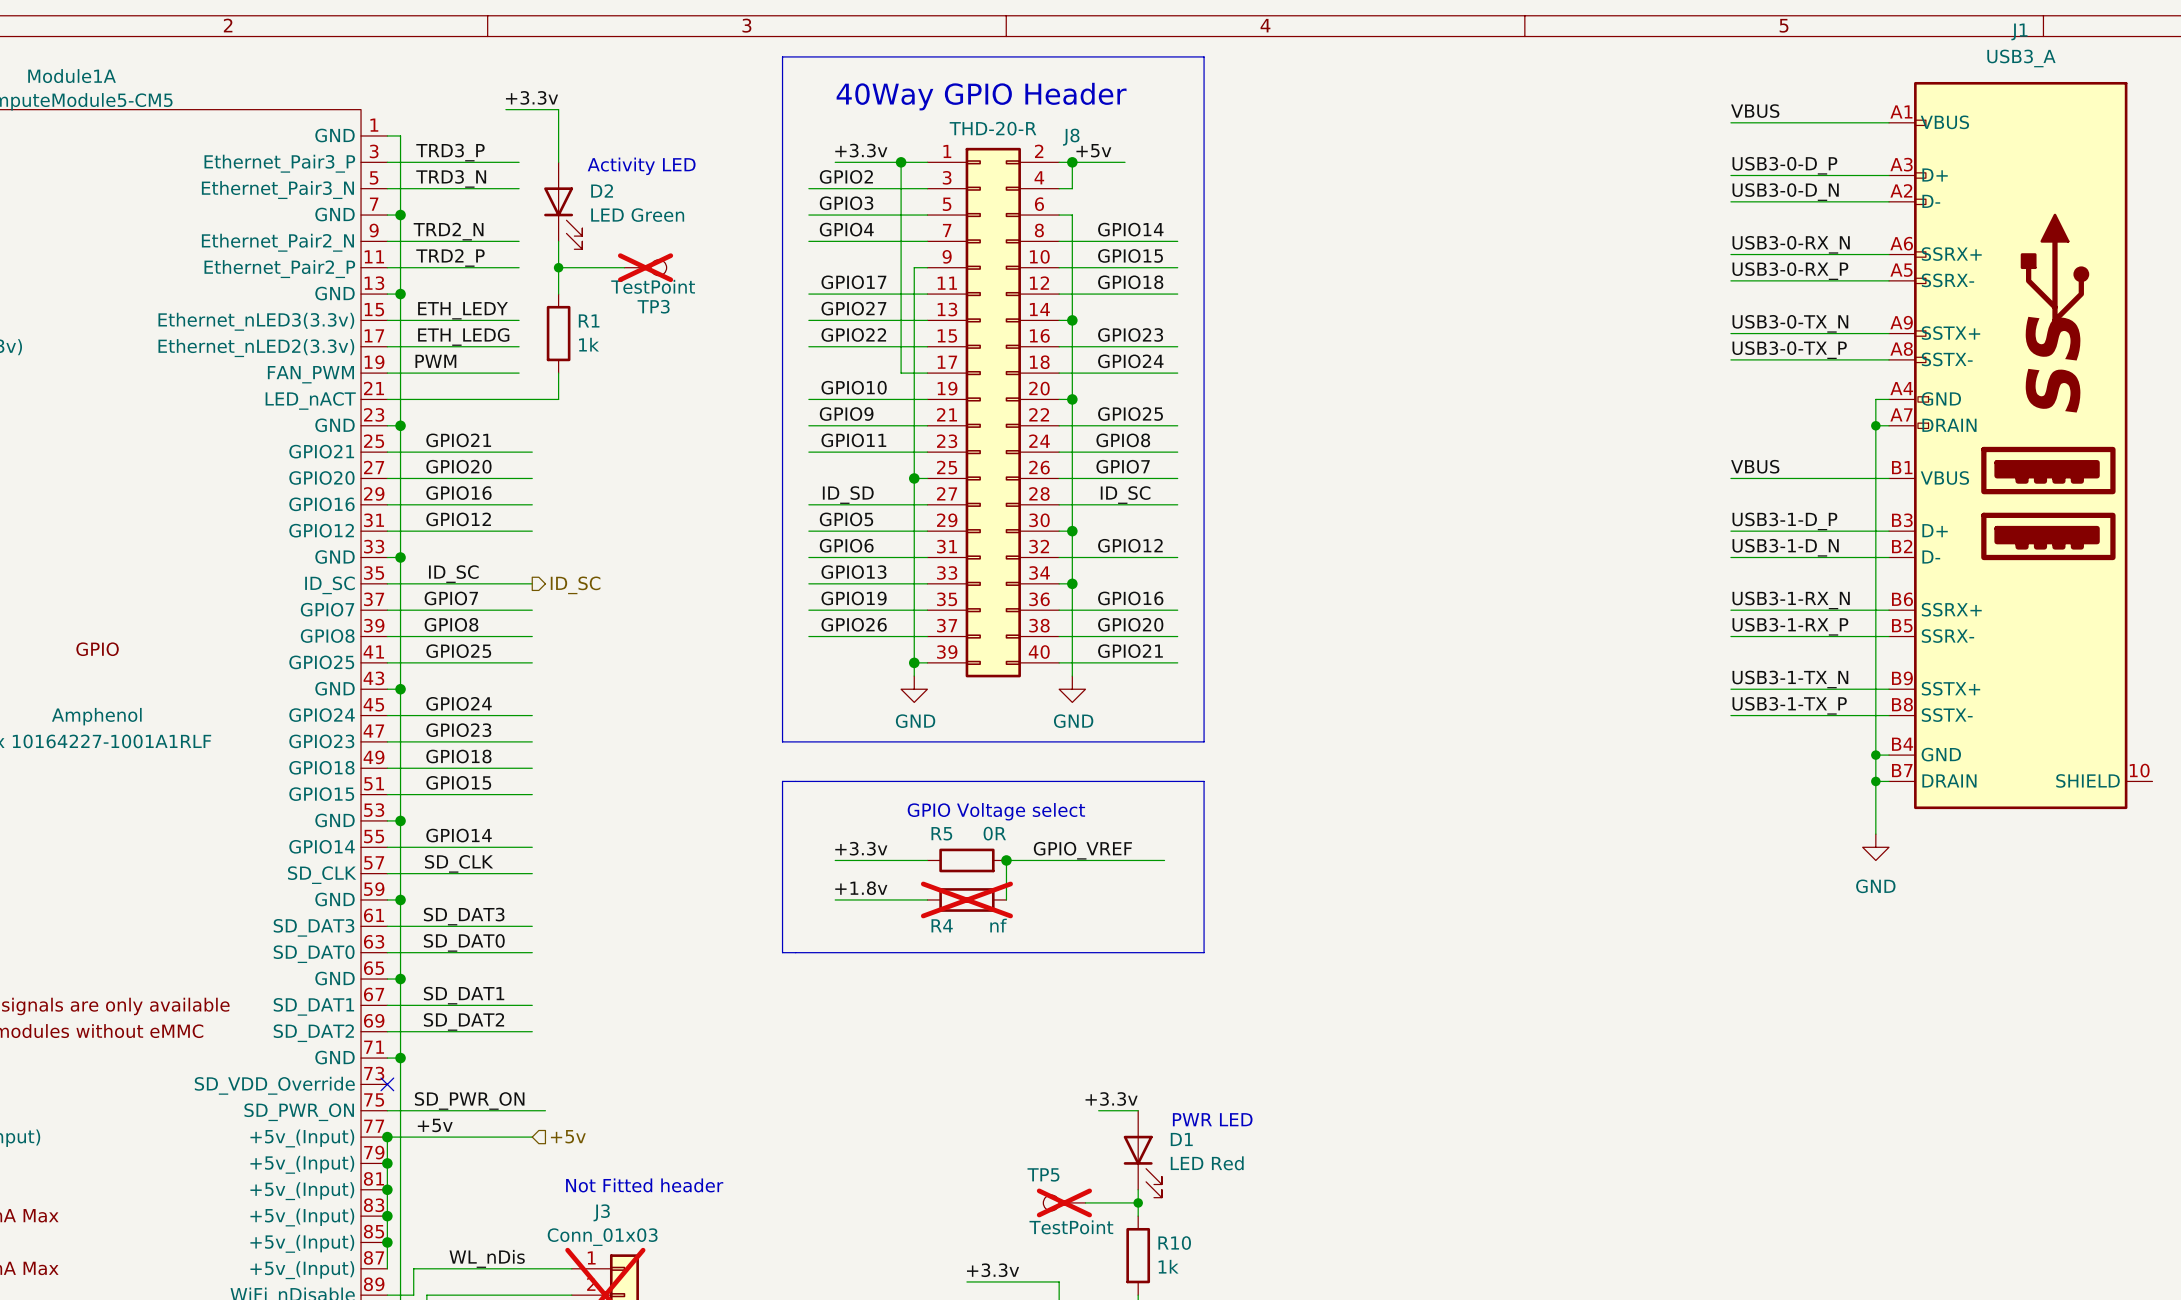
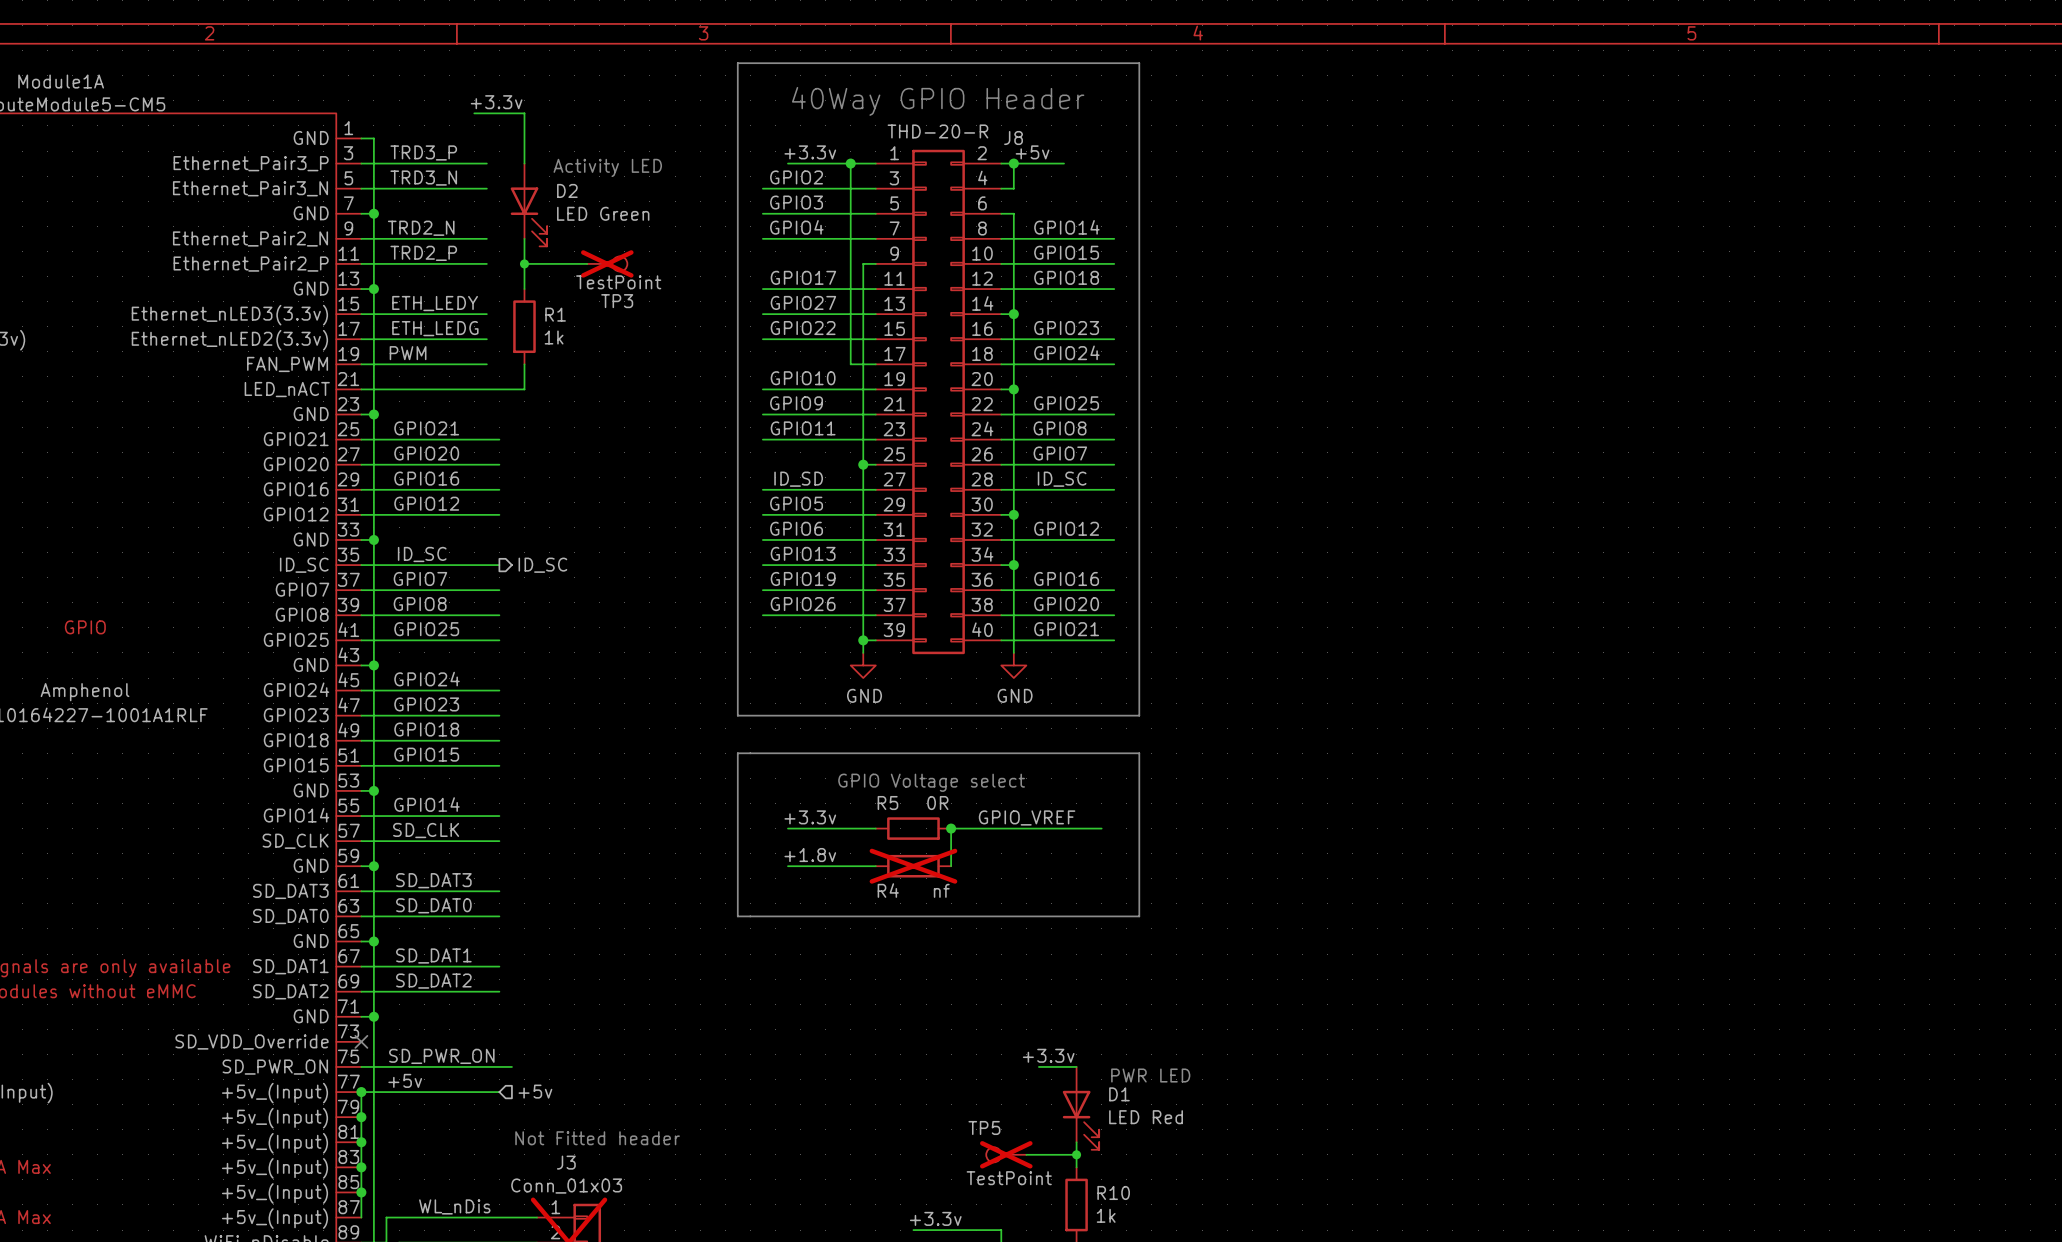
label: VBUS (1755, 111) -> none
wire: (1730, 122) (1889, 122) -> none
label: USB3-0-D_P (1784, 165) -> none
wire: (1730, 175) (1889, 175) -> none
label: USB3-0-D_N (1785, 192) -> none
wire: (1730, 201) (1889, 201) -> none
label: USB3-0-RX_N (1791, 244) -> none
wire: (1730, 254) (1889, 254) -> none
label: USB3-0-RX_P (1790, 271) -> none
wire: (1730, 280) (1889, 280) -> none
label: USB3-0-TX_N (1790, 323) -> none
wire: (1730, 333) (1889, 333) -> none
label: USB3-0-TX_P (1789, 350) -> none
wire: (1730, 359) (1889, 359) -> none
wire: (1889, 399) (1875, 399) (1875, 834) -> none
wire: (1875, 425) (1889, 425) -> none
junction: (1875, 425) -> none
J1: USB3_A (2020, 445) -> none
label: VBUS (1755, 466) -> none
wire: (1730, 478) (1889, 478) -> none
label: USB3-1-D_P (1784, 521) -> none
wire: (1730, 531) (1889, 531) -> none
label: USB3-1-D_N (1785, 547) -> none
wire: (1730, 557) (1889, 557) -> none
label: USB3-1-RX_N (1791, 600) -> none
wire: (1730, 610) (1889, 610) -> none
label: USB3-1-RX_P (1790, 626) -> none
wire: (1730, 636) (1889, 636) -> none
label: USB3-1-TX_N (1790, 679) -> none
wire: (1730, 689) (1889, 689) -> none
label: USB3-1-TX_P (1789, 705) -> none
wire: (1730, 715) (1889, 715) -> none
wire: (1875, 755) (1889, 755) -> none
junction: (1875, 755) -> none
wire: (1875, 781) (1889, 781) -> none
junction: (1875, 781) -> none
power symbol: GND (1875, 847) -> none

